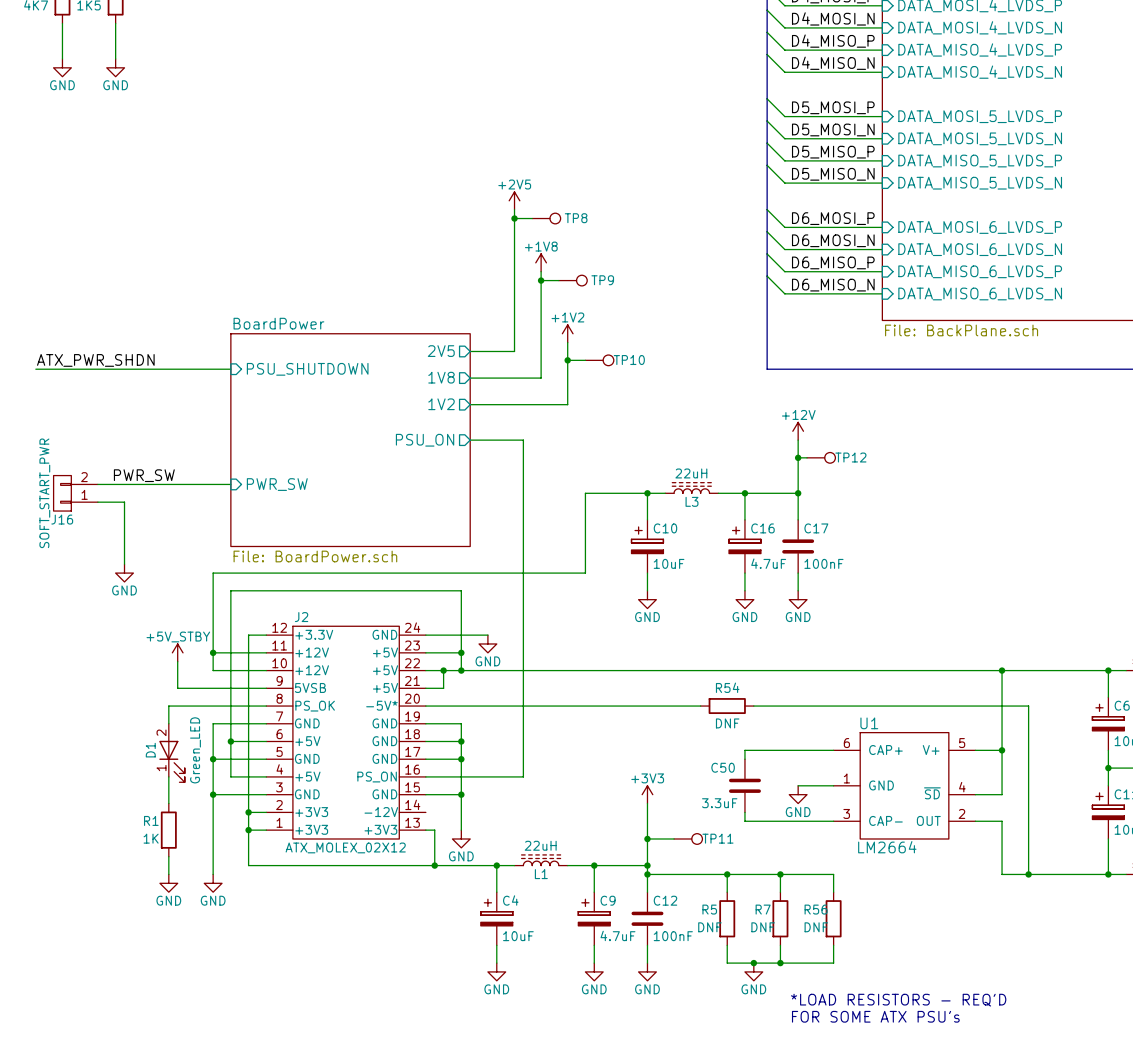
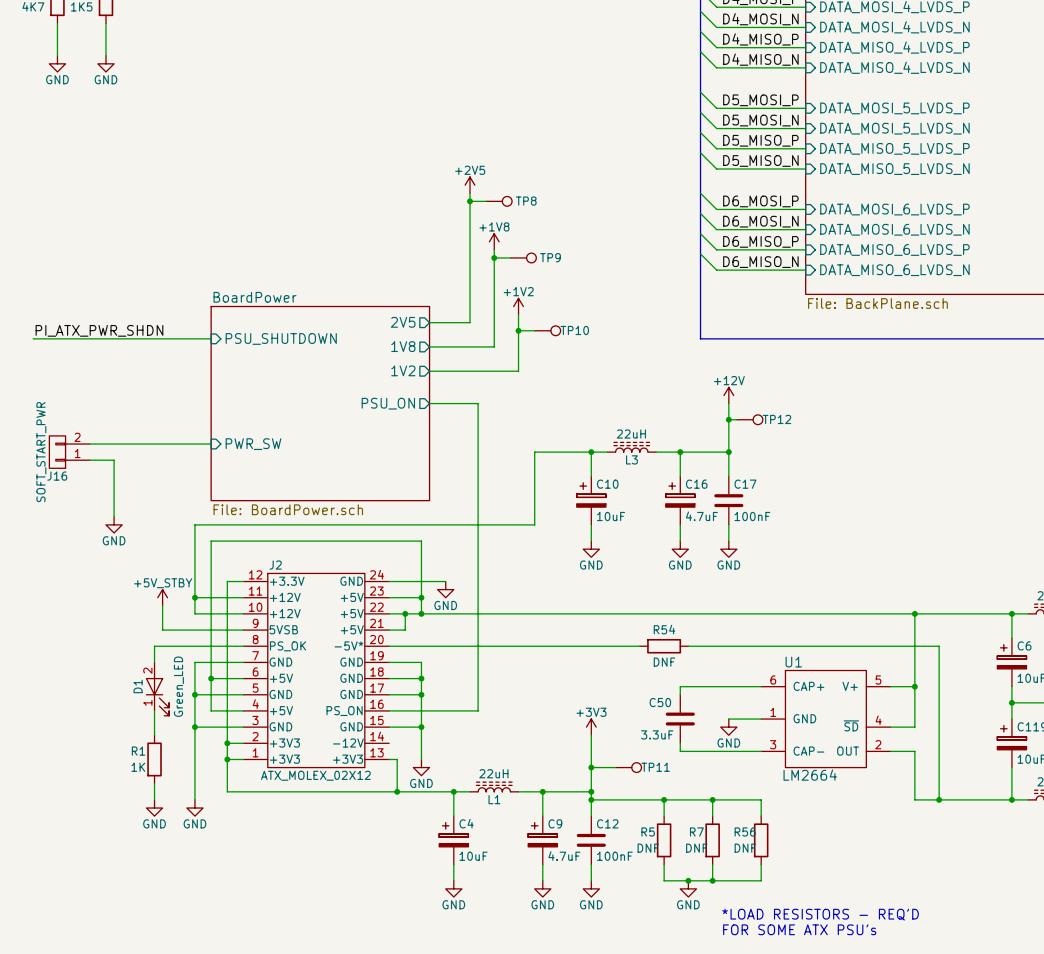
label: ATX_PWR_SHDN (95, 360) -> PI_ATX_PWR_SHDN (99, 330)
label: PWR_SW (144, 475) -> none

